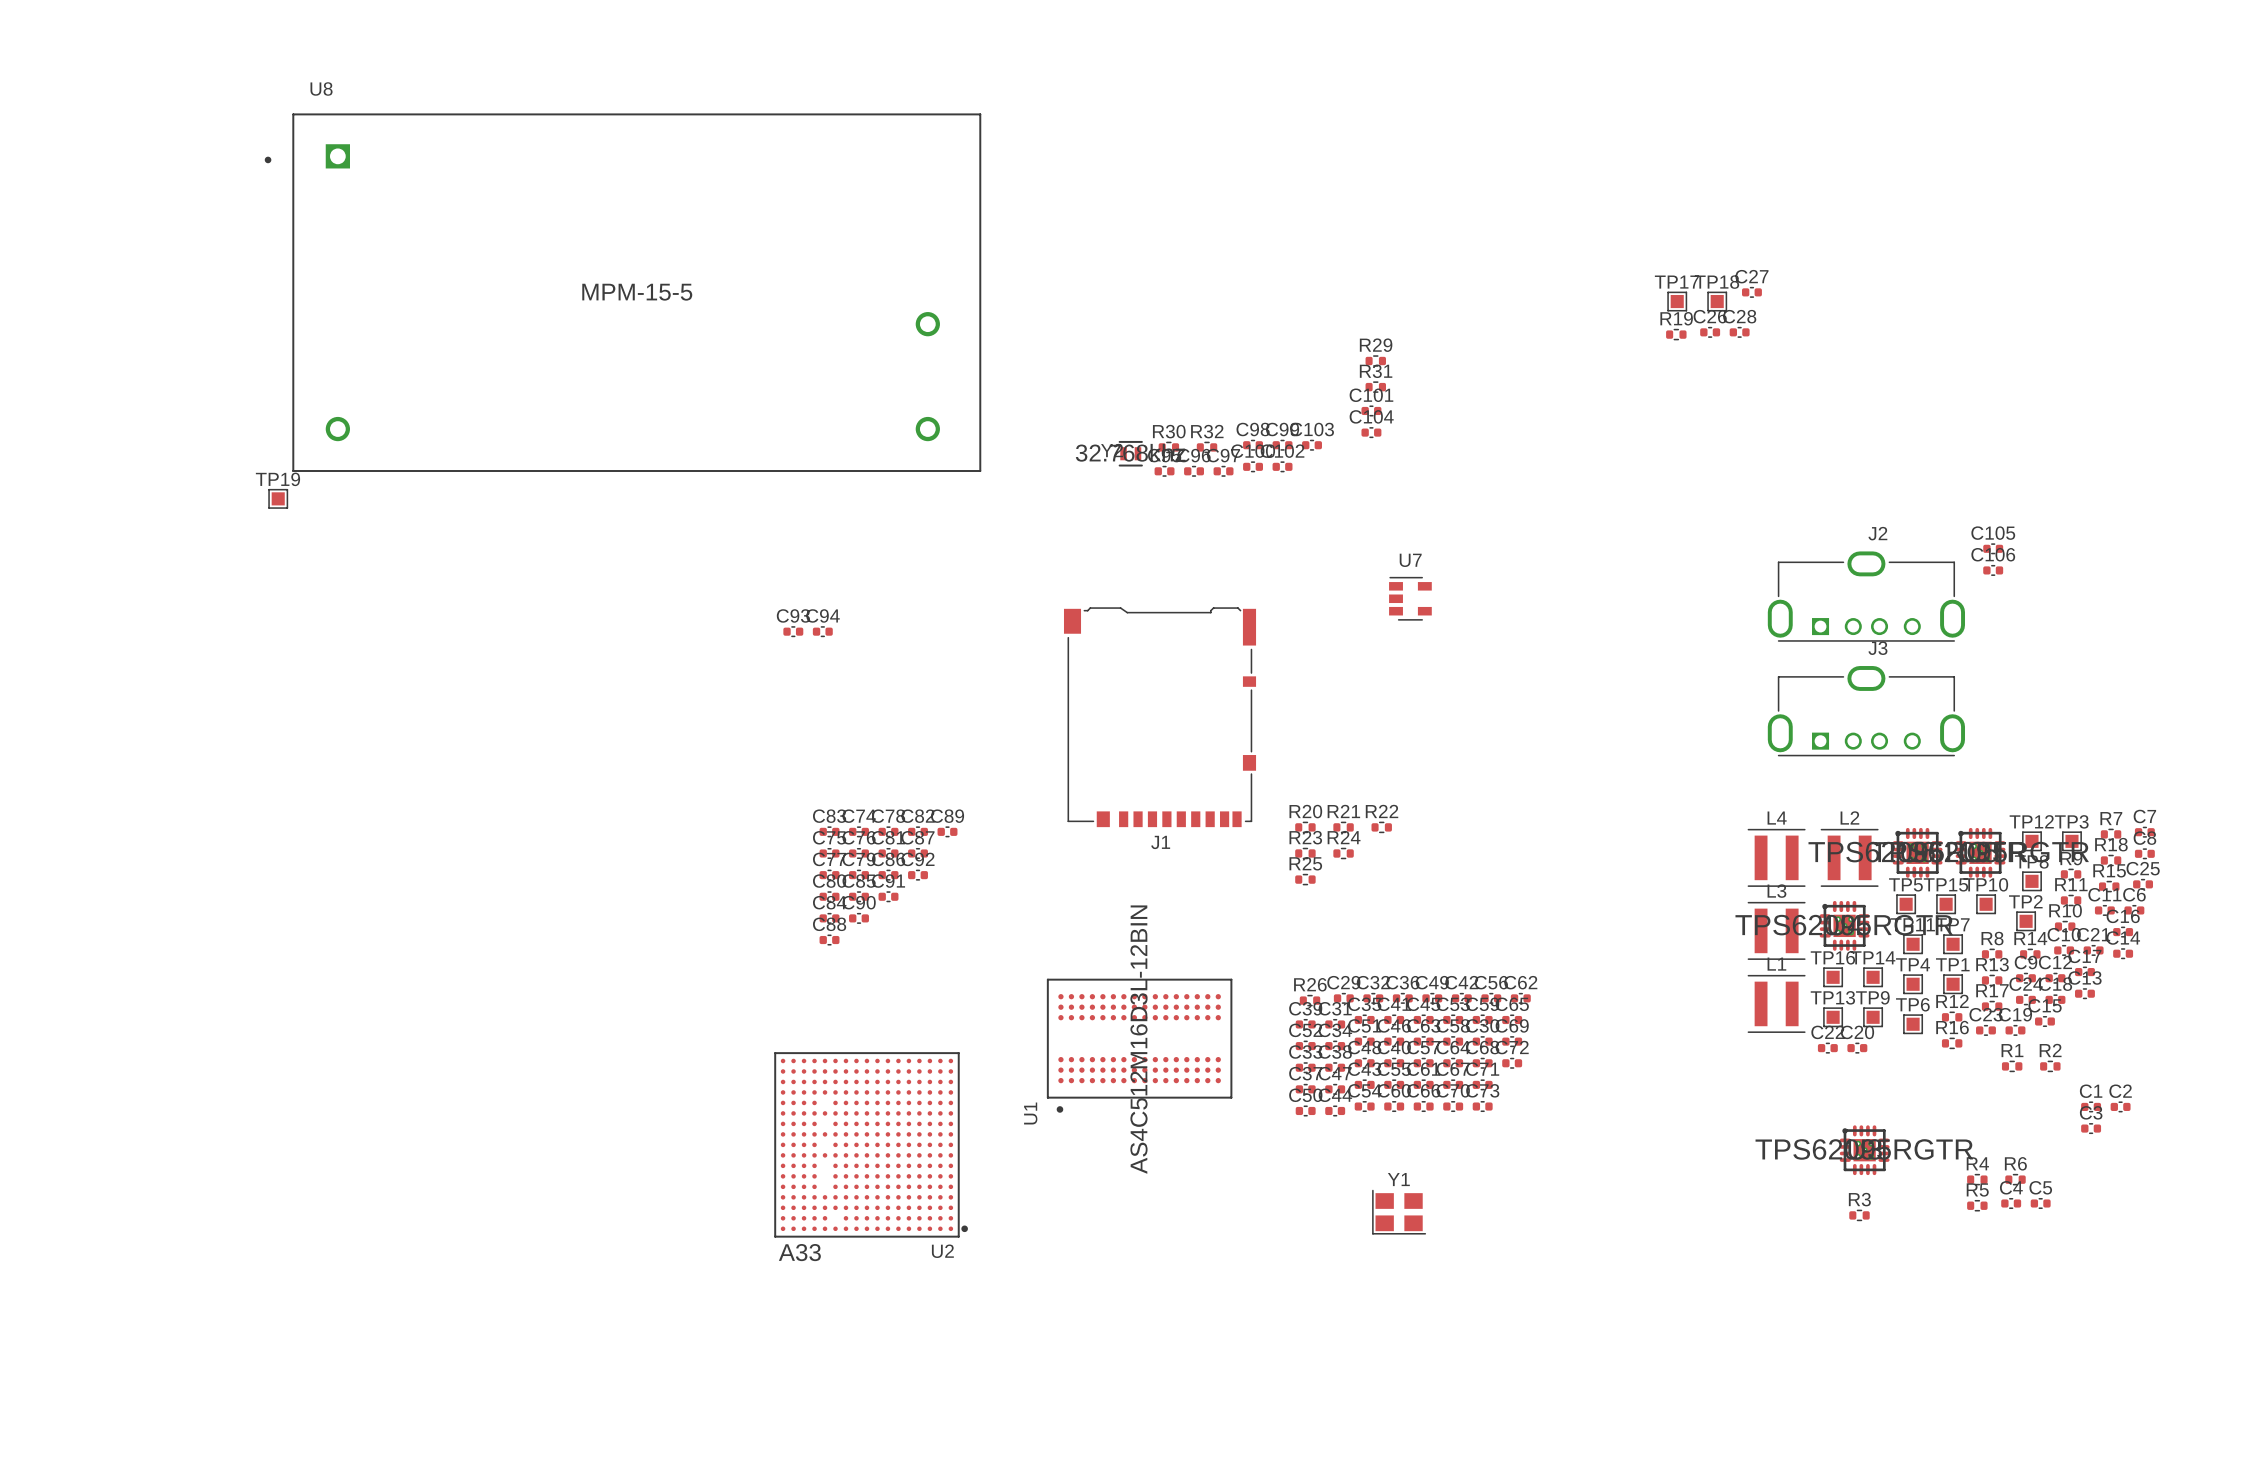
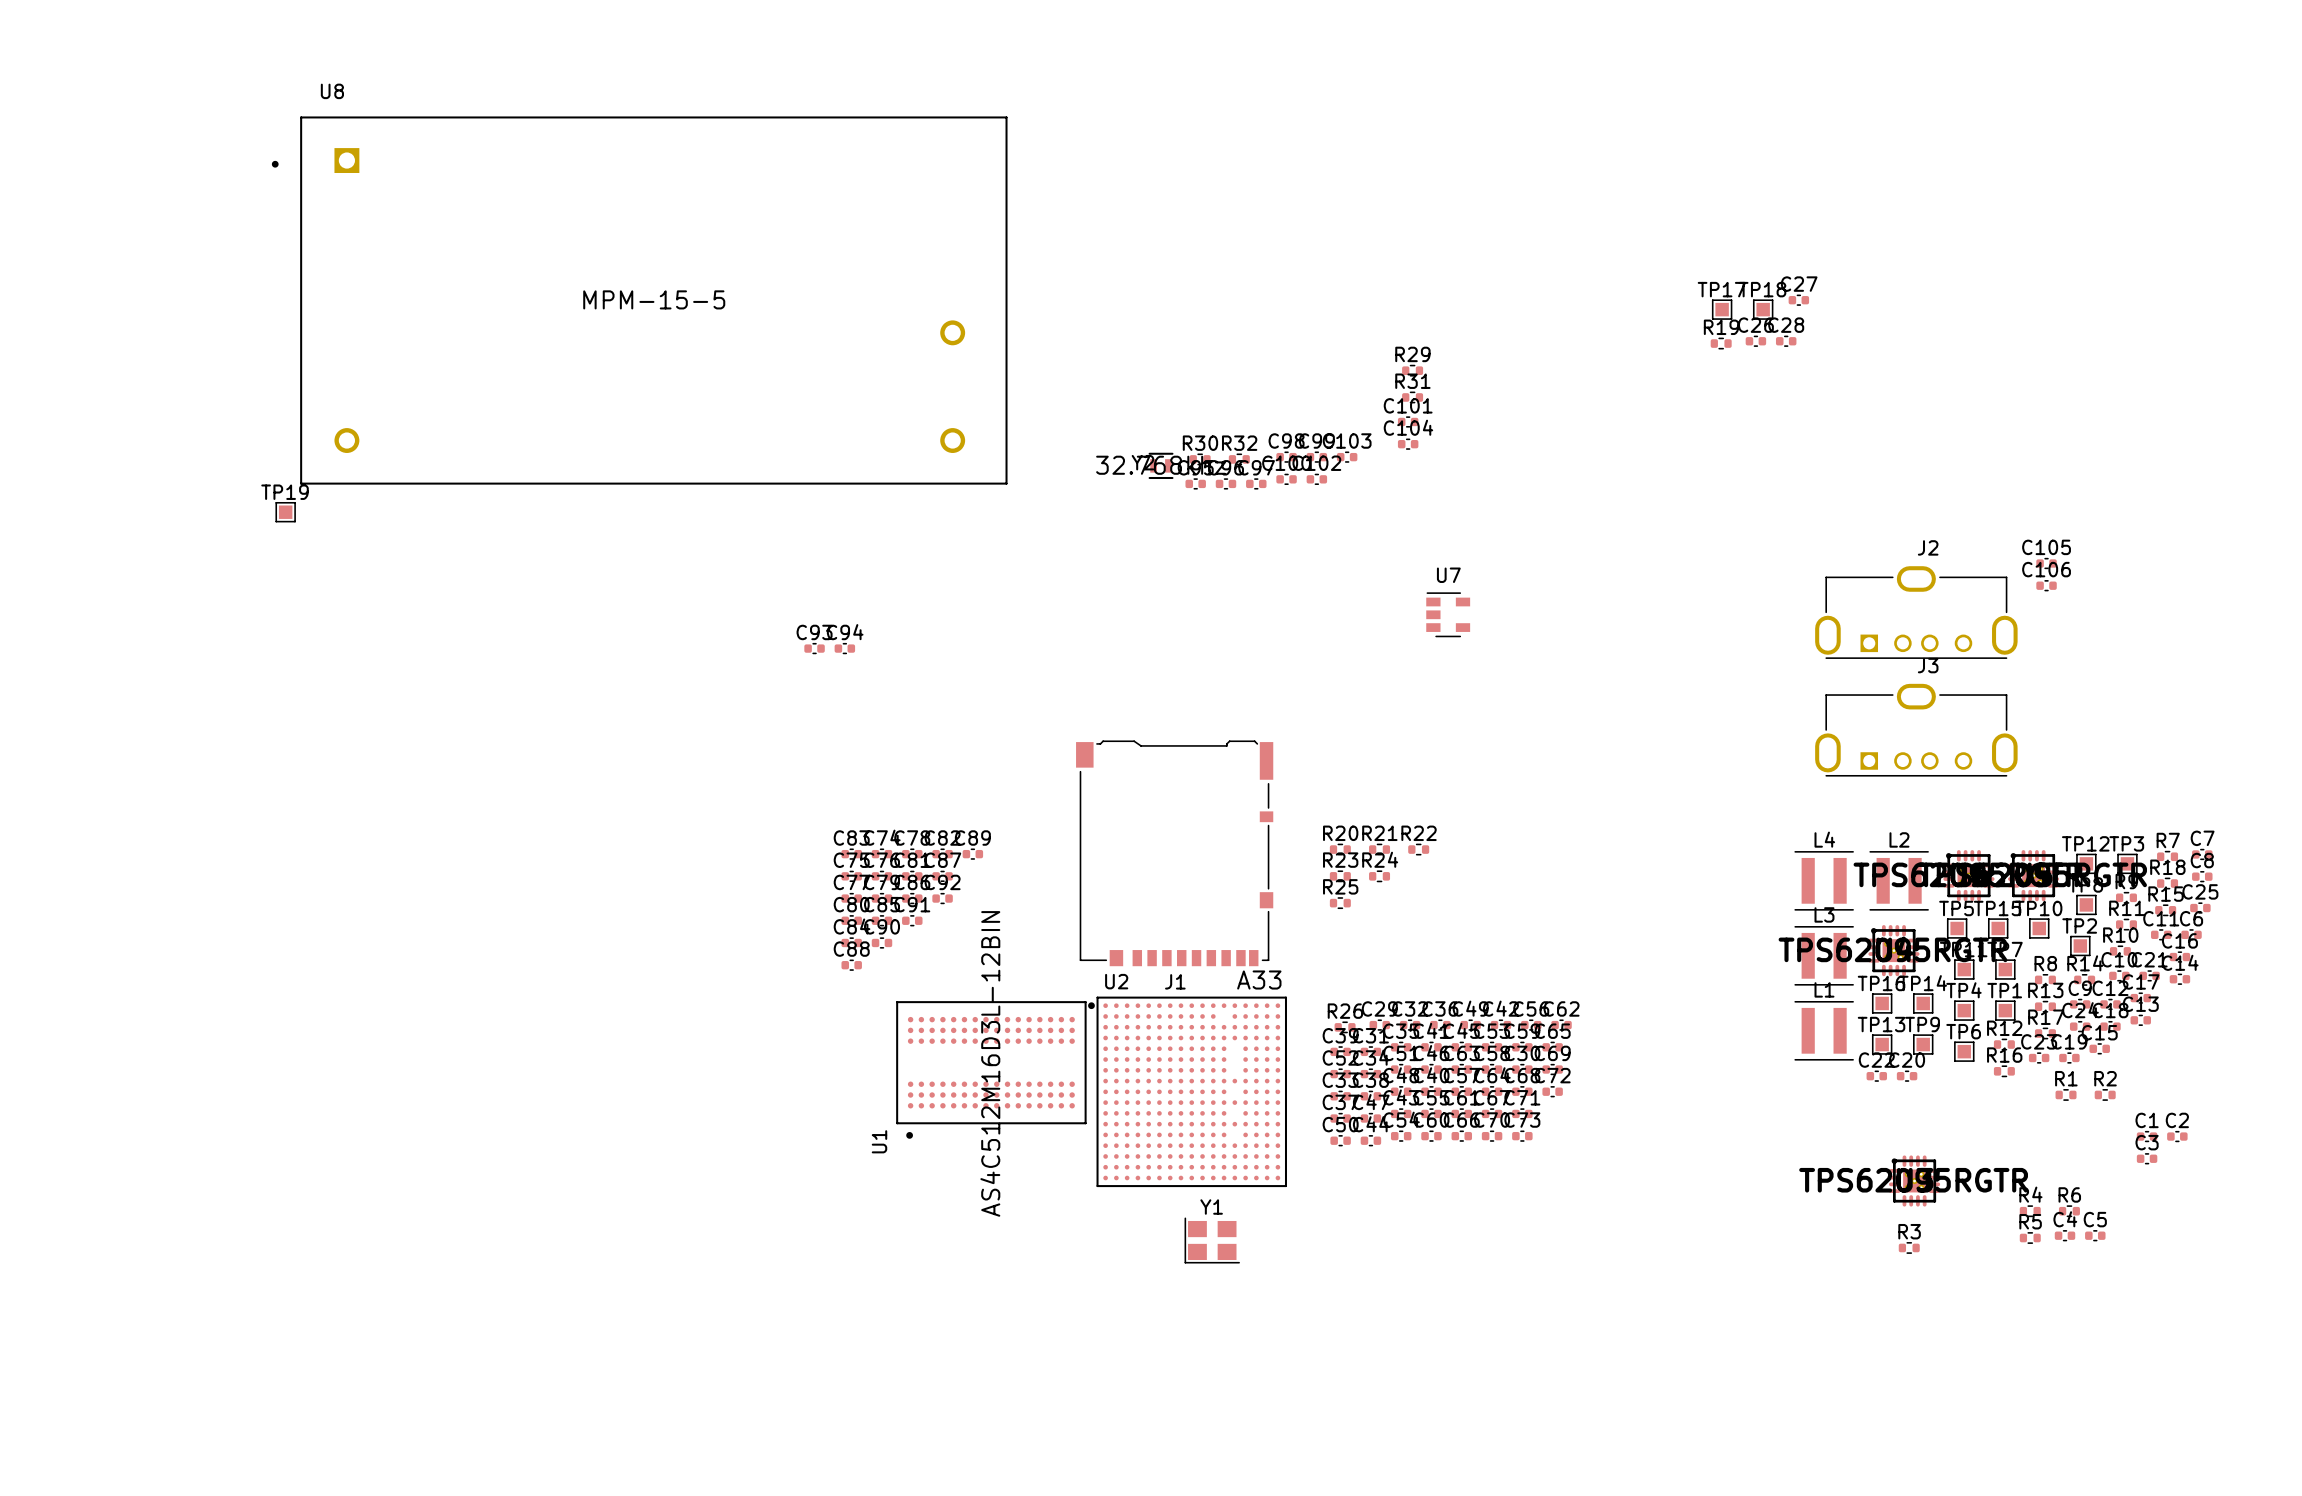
J1 position: (1160, 717) -> (1174, 853)
U1 position: (1139, 1045) -> (991, 1069)
U2 rotation: 0° (871, 1144) -> 180° (1187, 1091)
U2 position: (871, 1144) -> (1187, 1091)
Y1 position: (1399, 1212) -> (1212, 1240)

